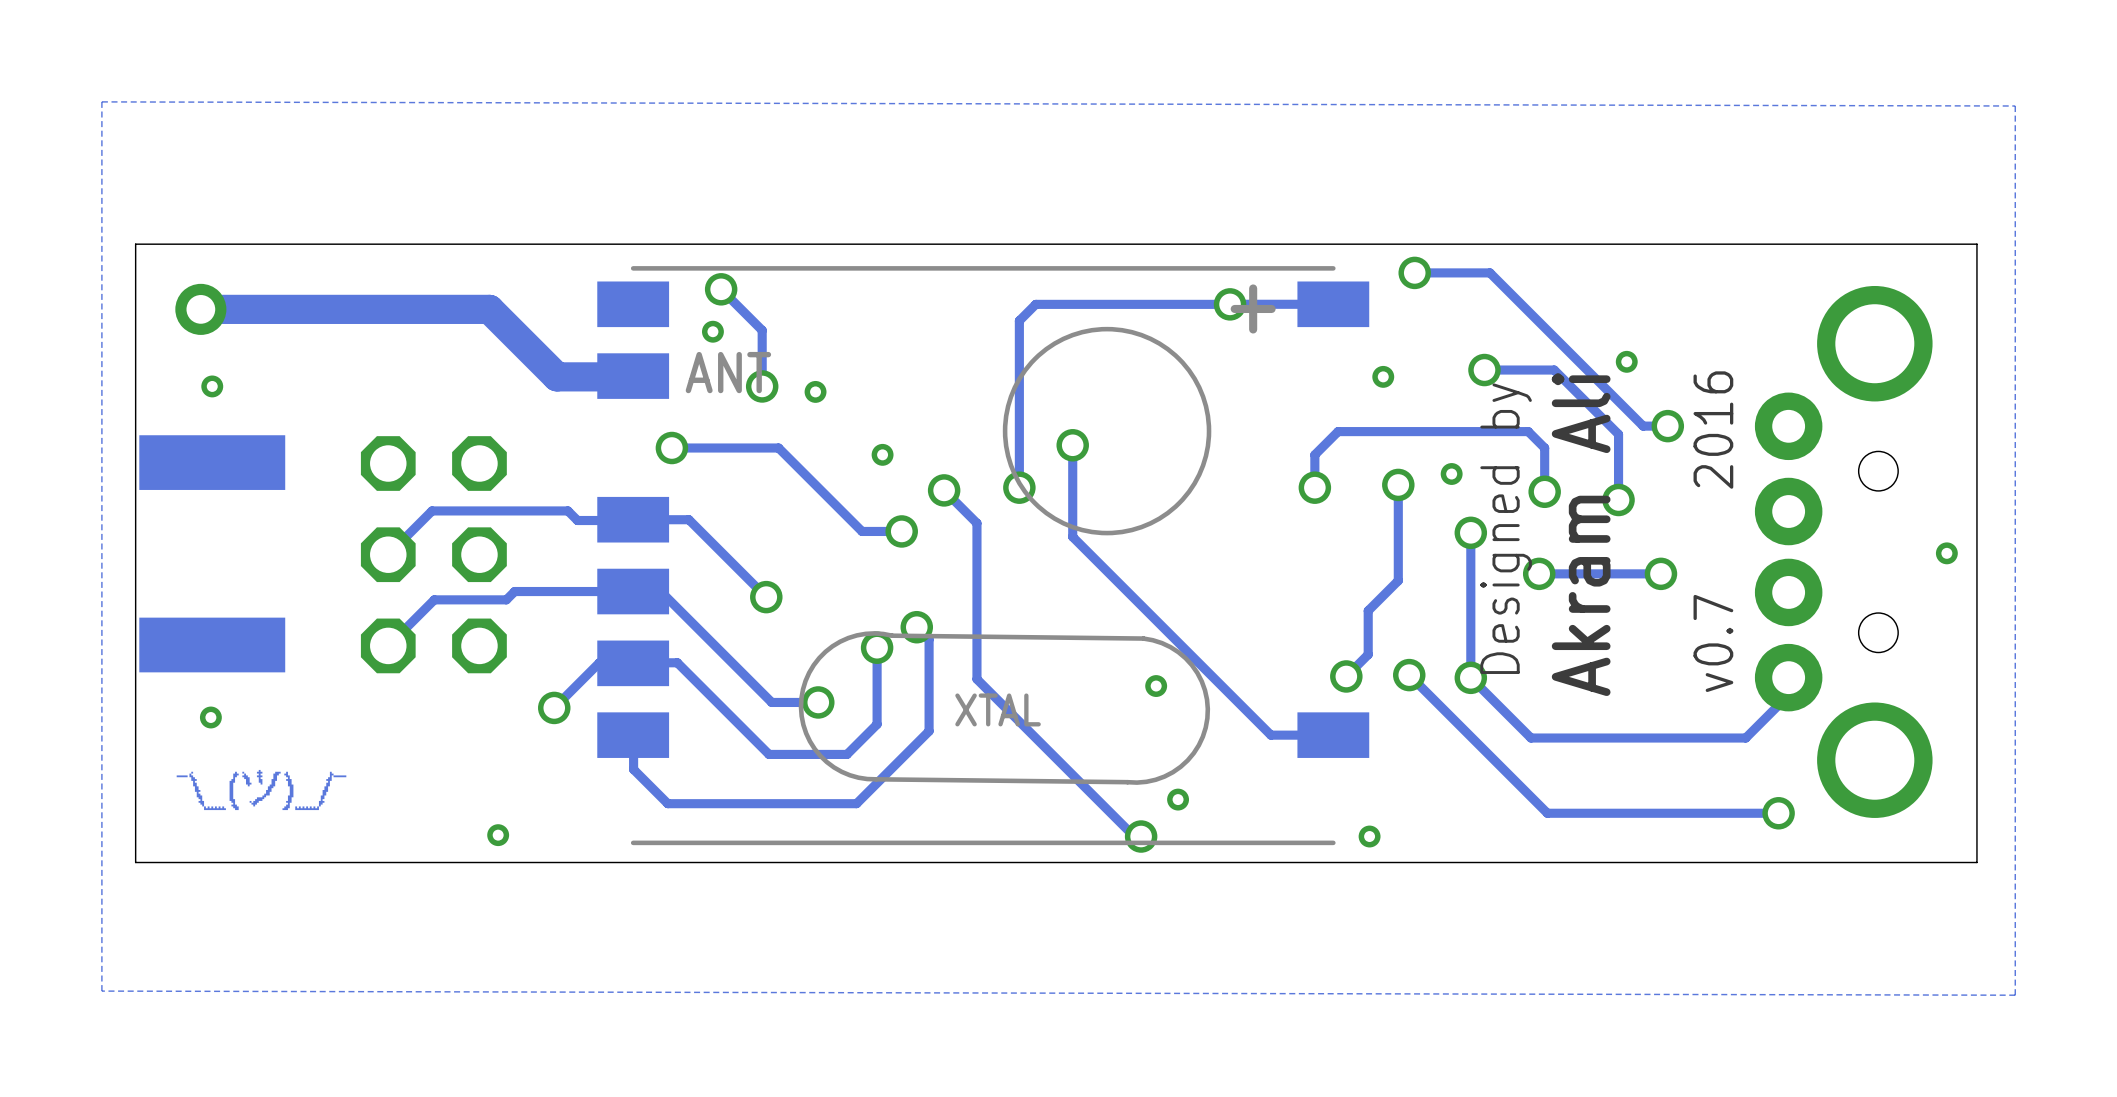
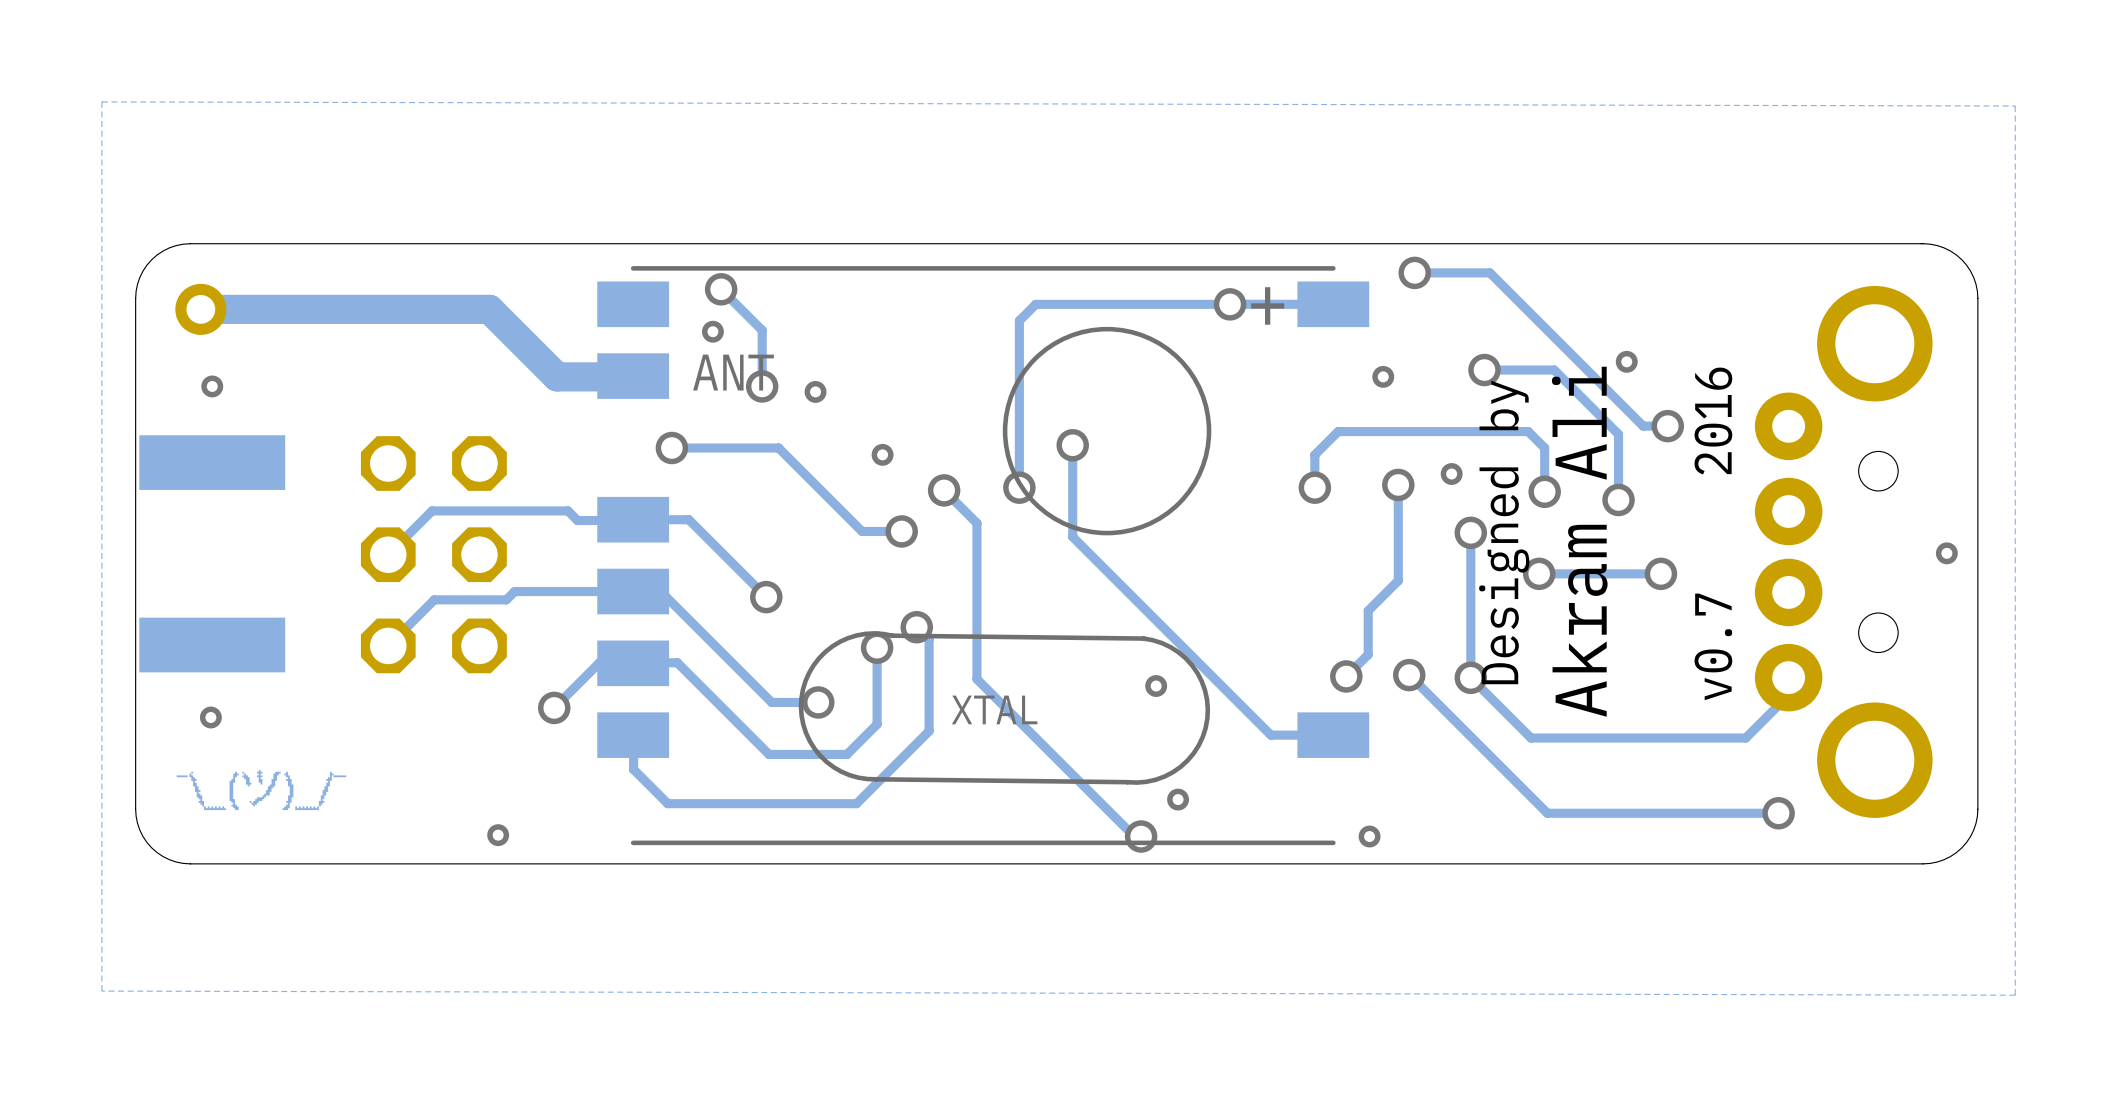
board edge: (135, 298) (135, 244) (1976, 244) (1976, 862) (135, 862) (135, 809) -> (135, 298) (139, 277) (151, 259) (169, 247) (190, 243) (1923, 243) (1944, 247) (1961, 259) (1973, 277) (1977, 298) (1977, 816) (1973, 830) (1966, 842) (1956, 852) (1937, 862) (1923, 863) (190, 863) (169, 859) (151, 847) (139, 830) (135, 809)

